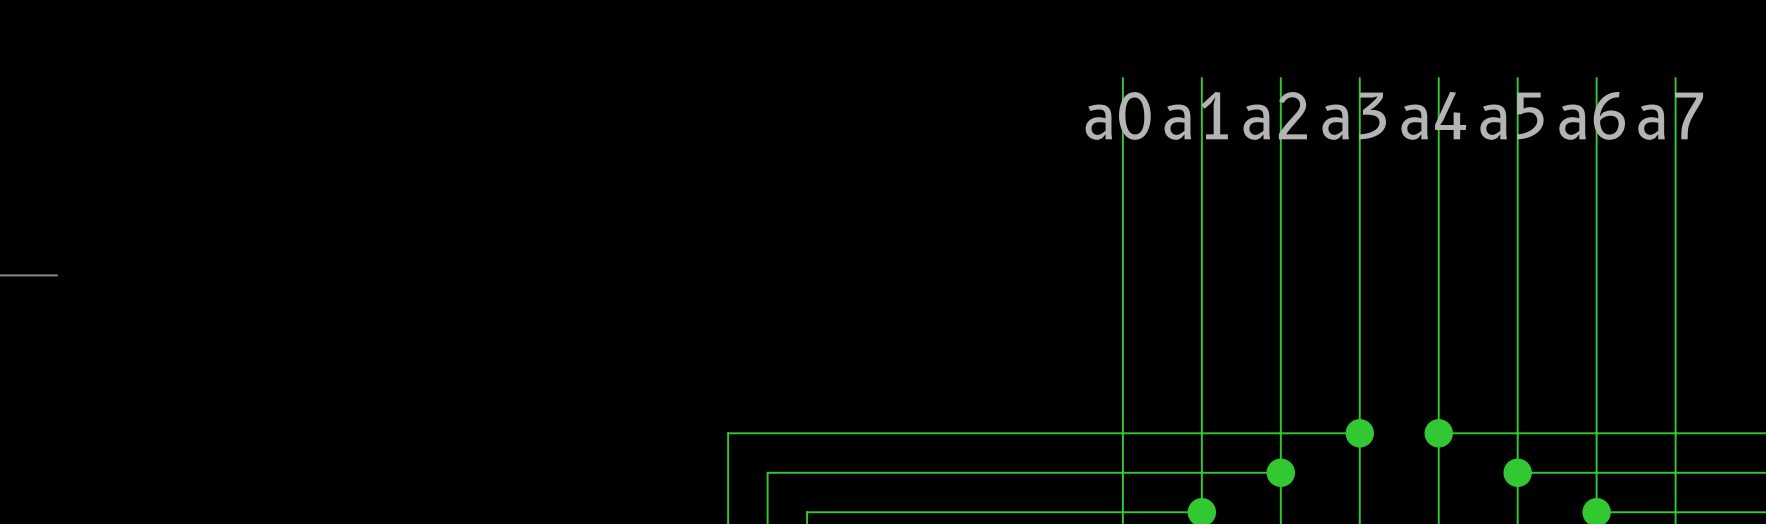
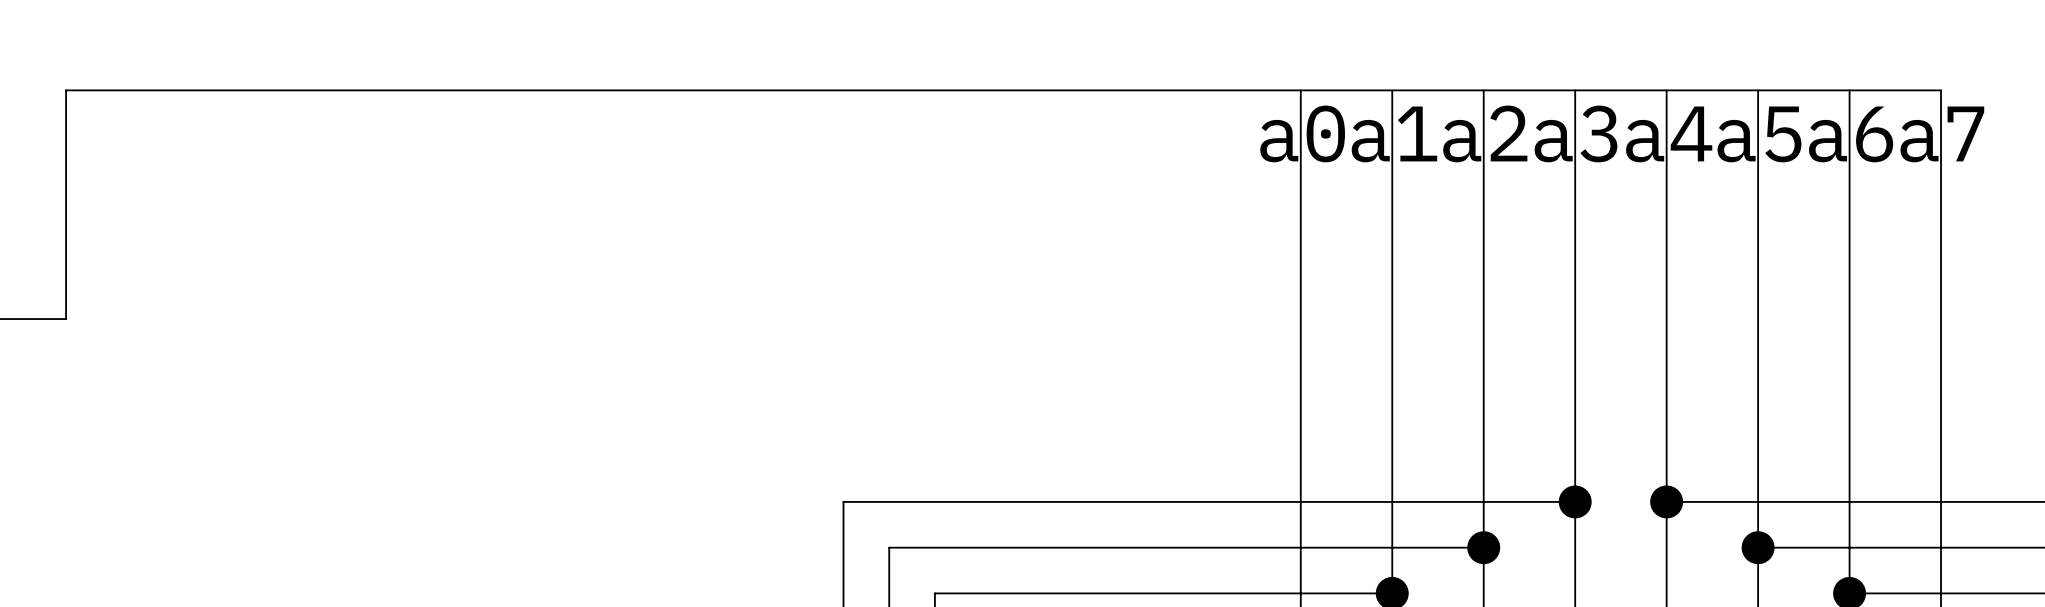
bus: none -> (1941, 90) (66, 90) (66, 319)

